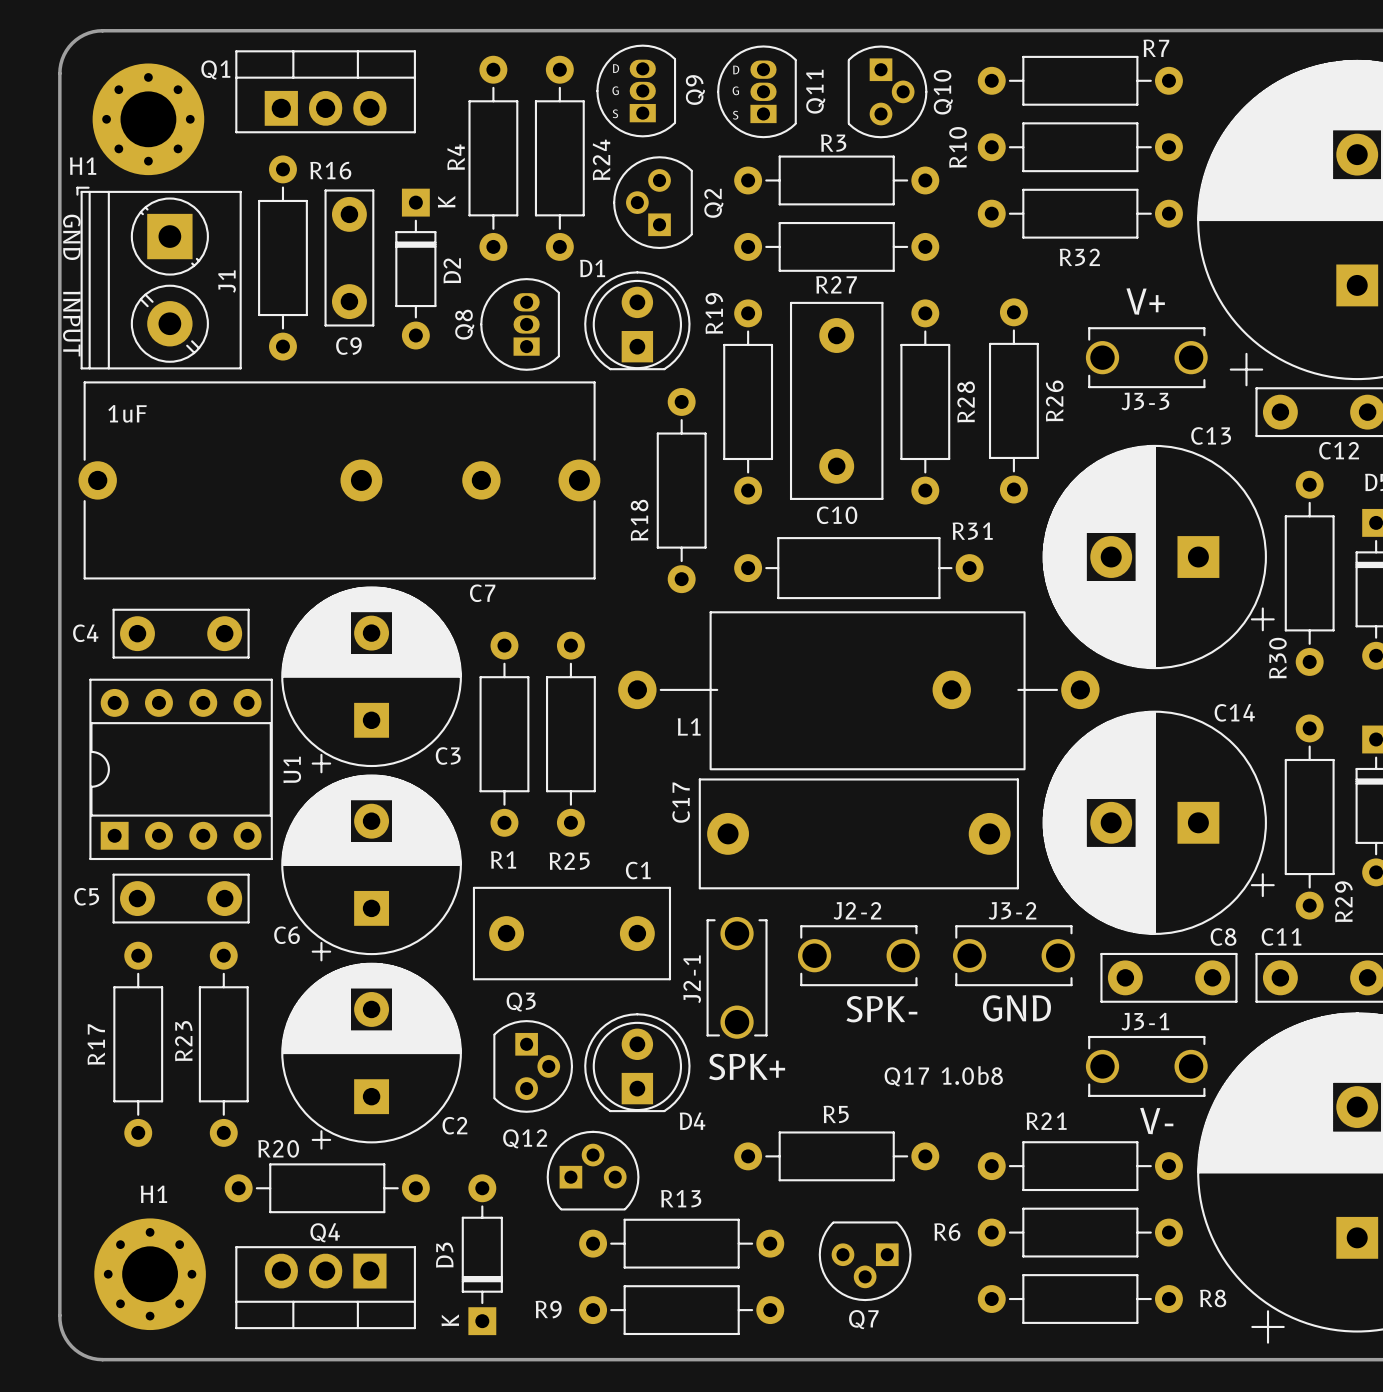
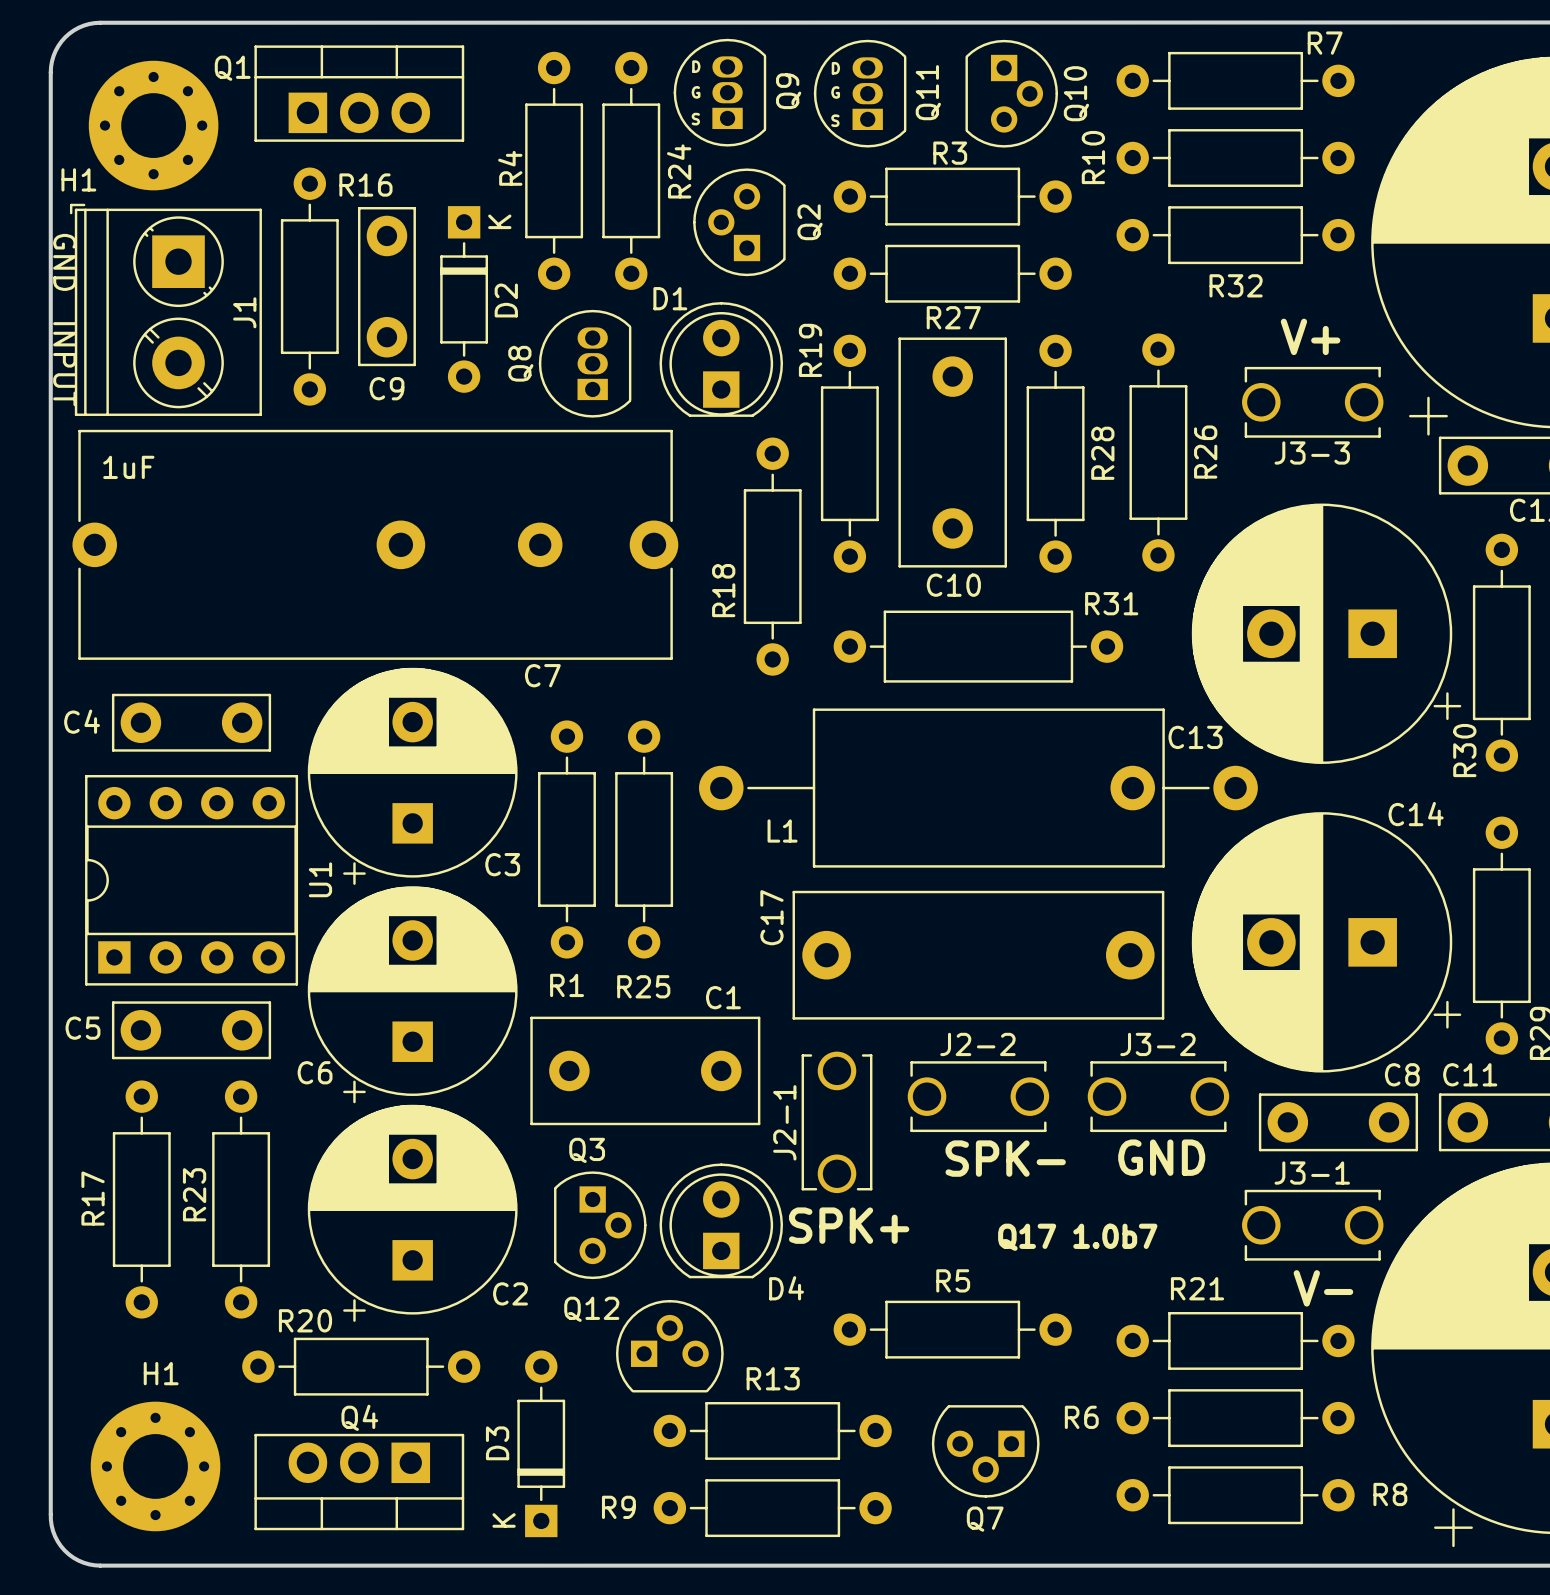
C13 name position: C13 (1211, 435) -> C13 (1195, 737)
L1 footprint: [618, 611, 1100, 771] -> [699, 708, 1258, 868]
text: Q17 1.0b8 (943, 1076) -> Q17 1.0b7 (1077, 1237)

